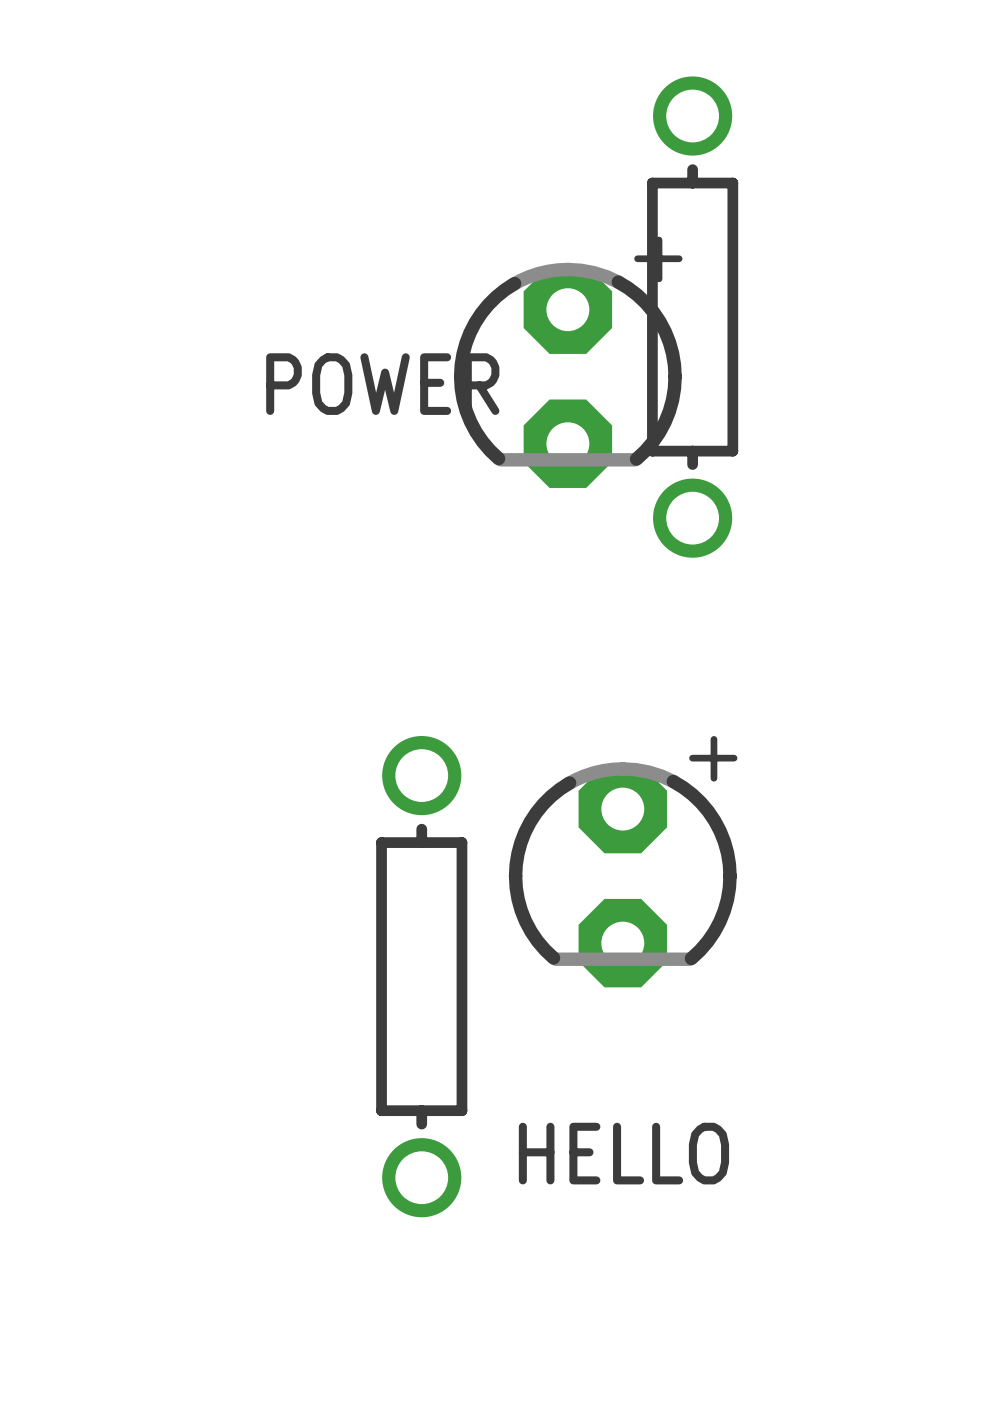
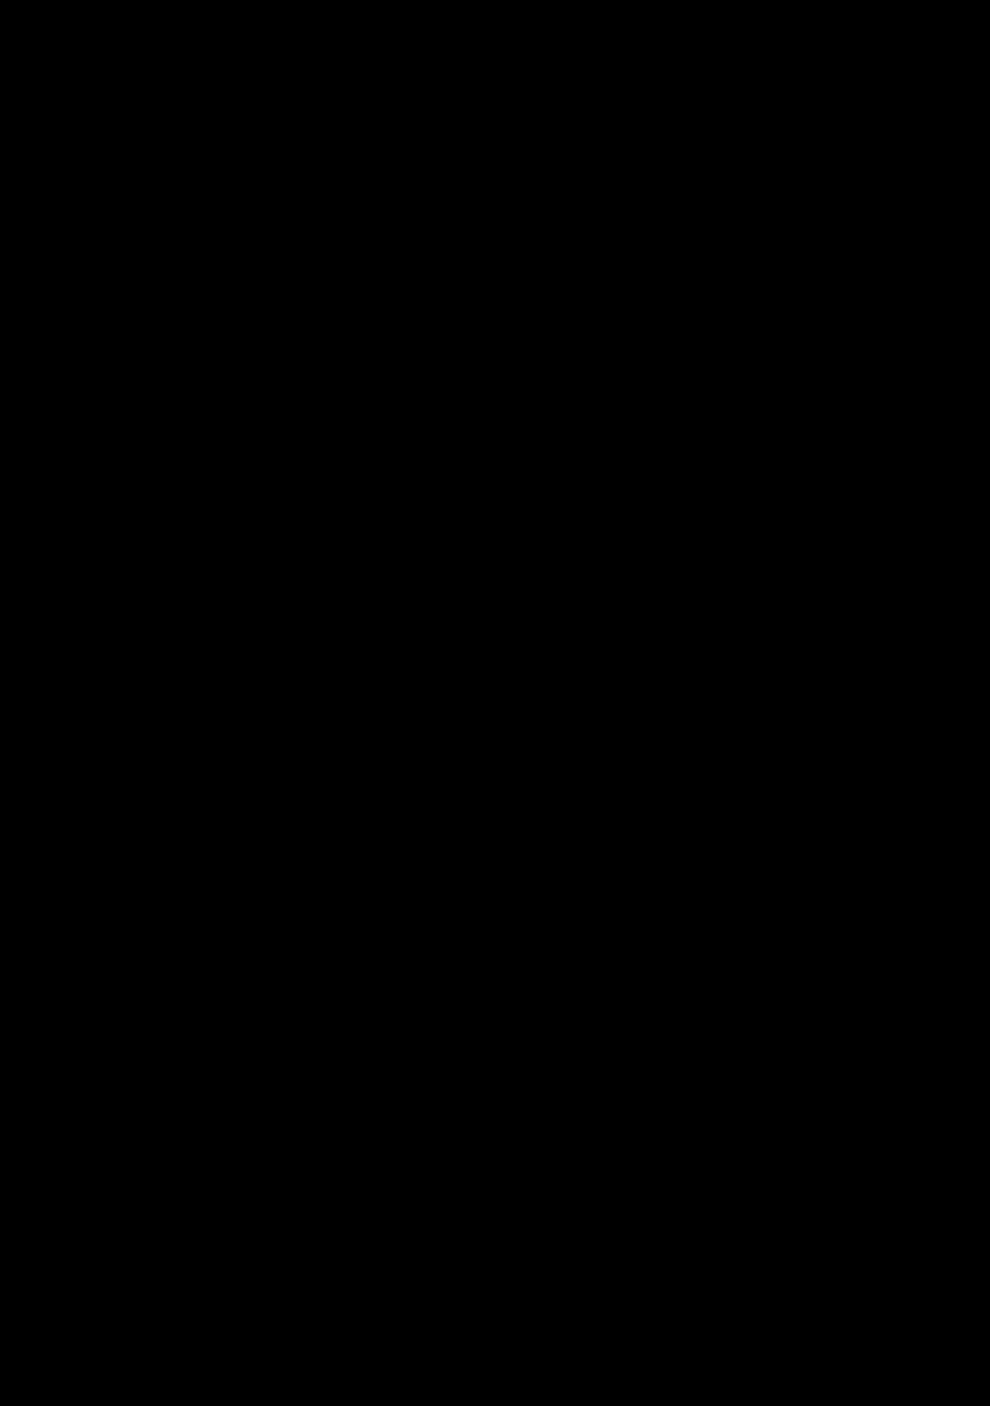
part: (692, 317) -> none
part: (568, 362) -> none
text: POWER (382, 384) -> none
part: (623, 861) -> none
part: (421, 976) -> none
text: HELLO (623, 1153) -> none

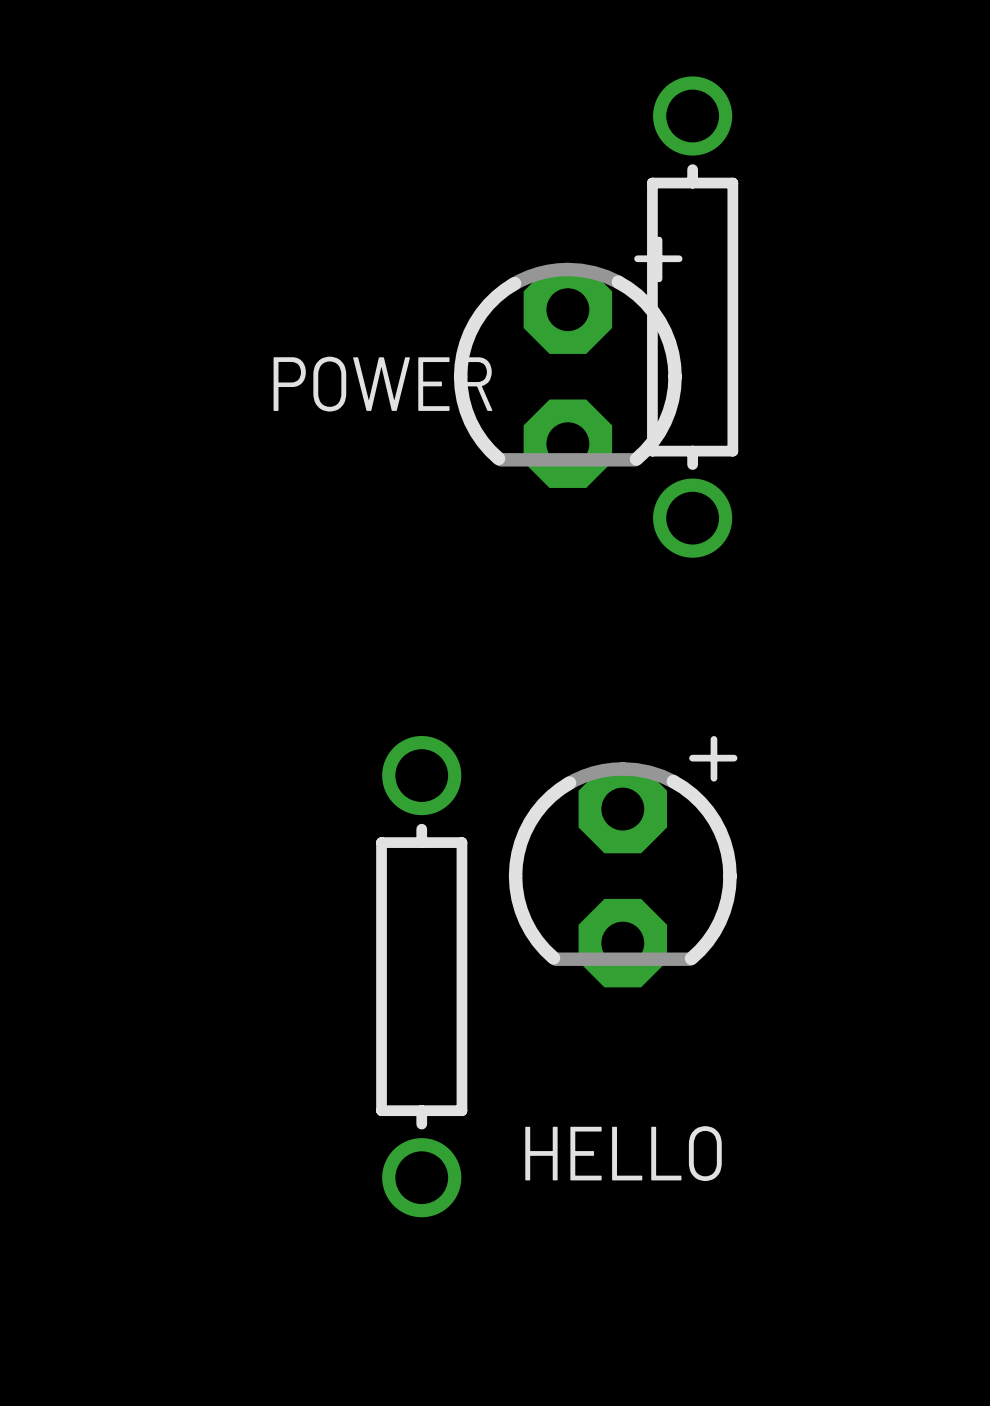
part: none -> (692, 317)
part: none -> (568, 362)
text: none -> POWER (382, 384)
part: none -> (623, 861)
part: none -> (421, 976)
text: none -> HELLO (623, 1153)

